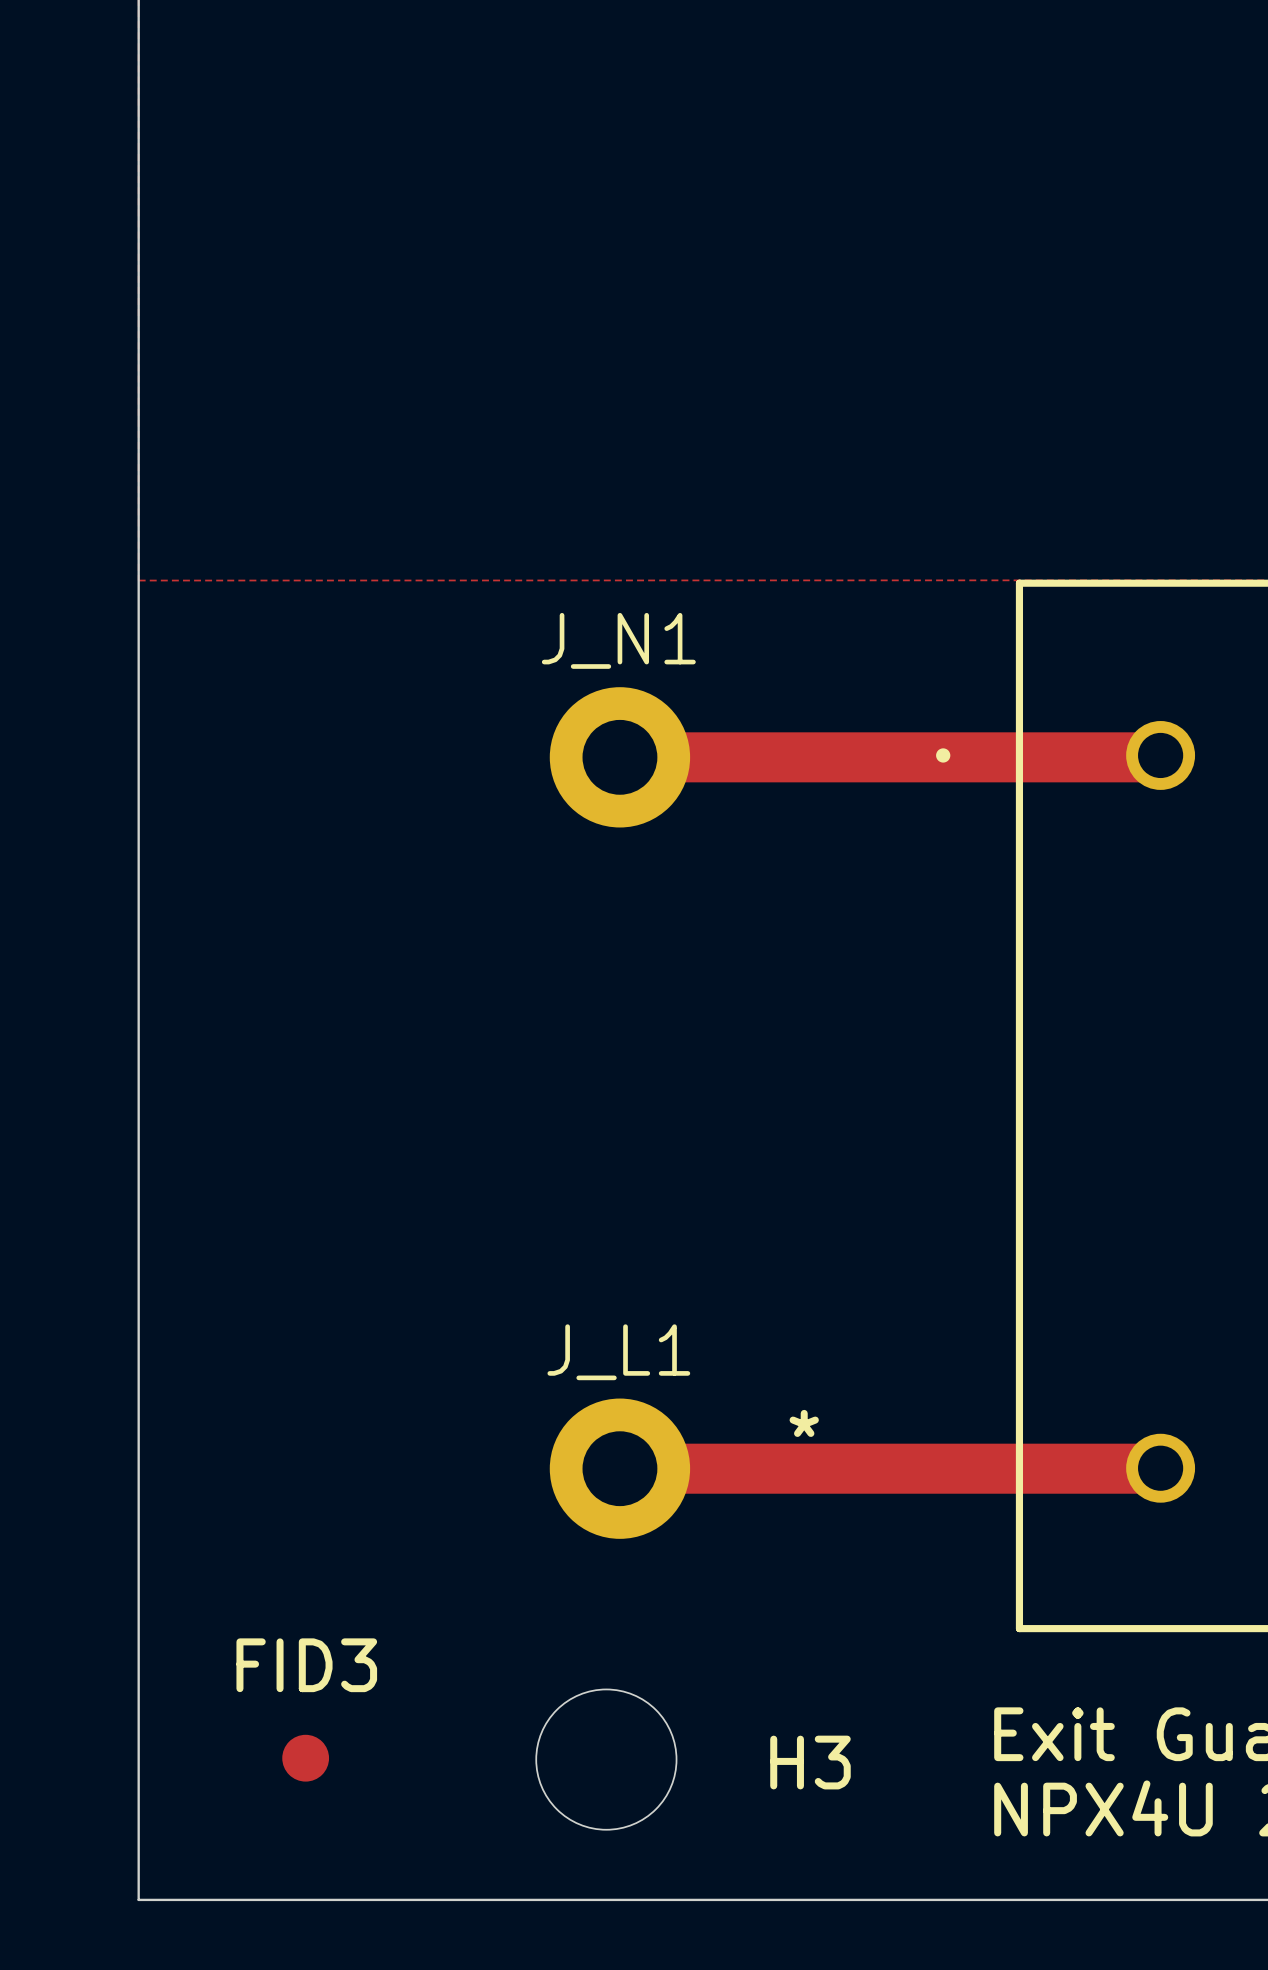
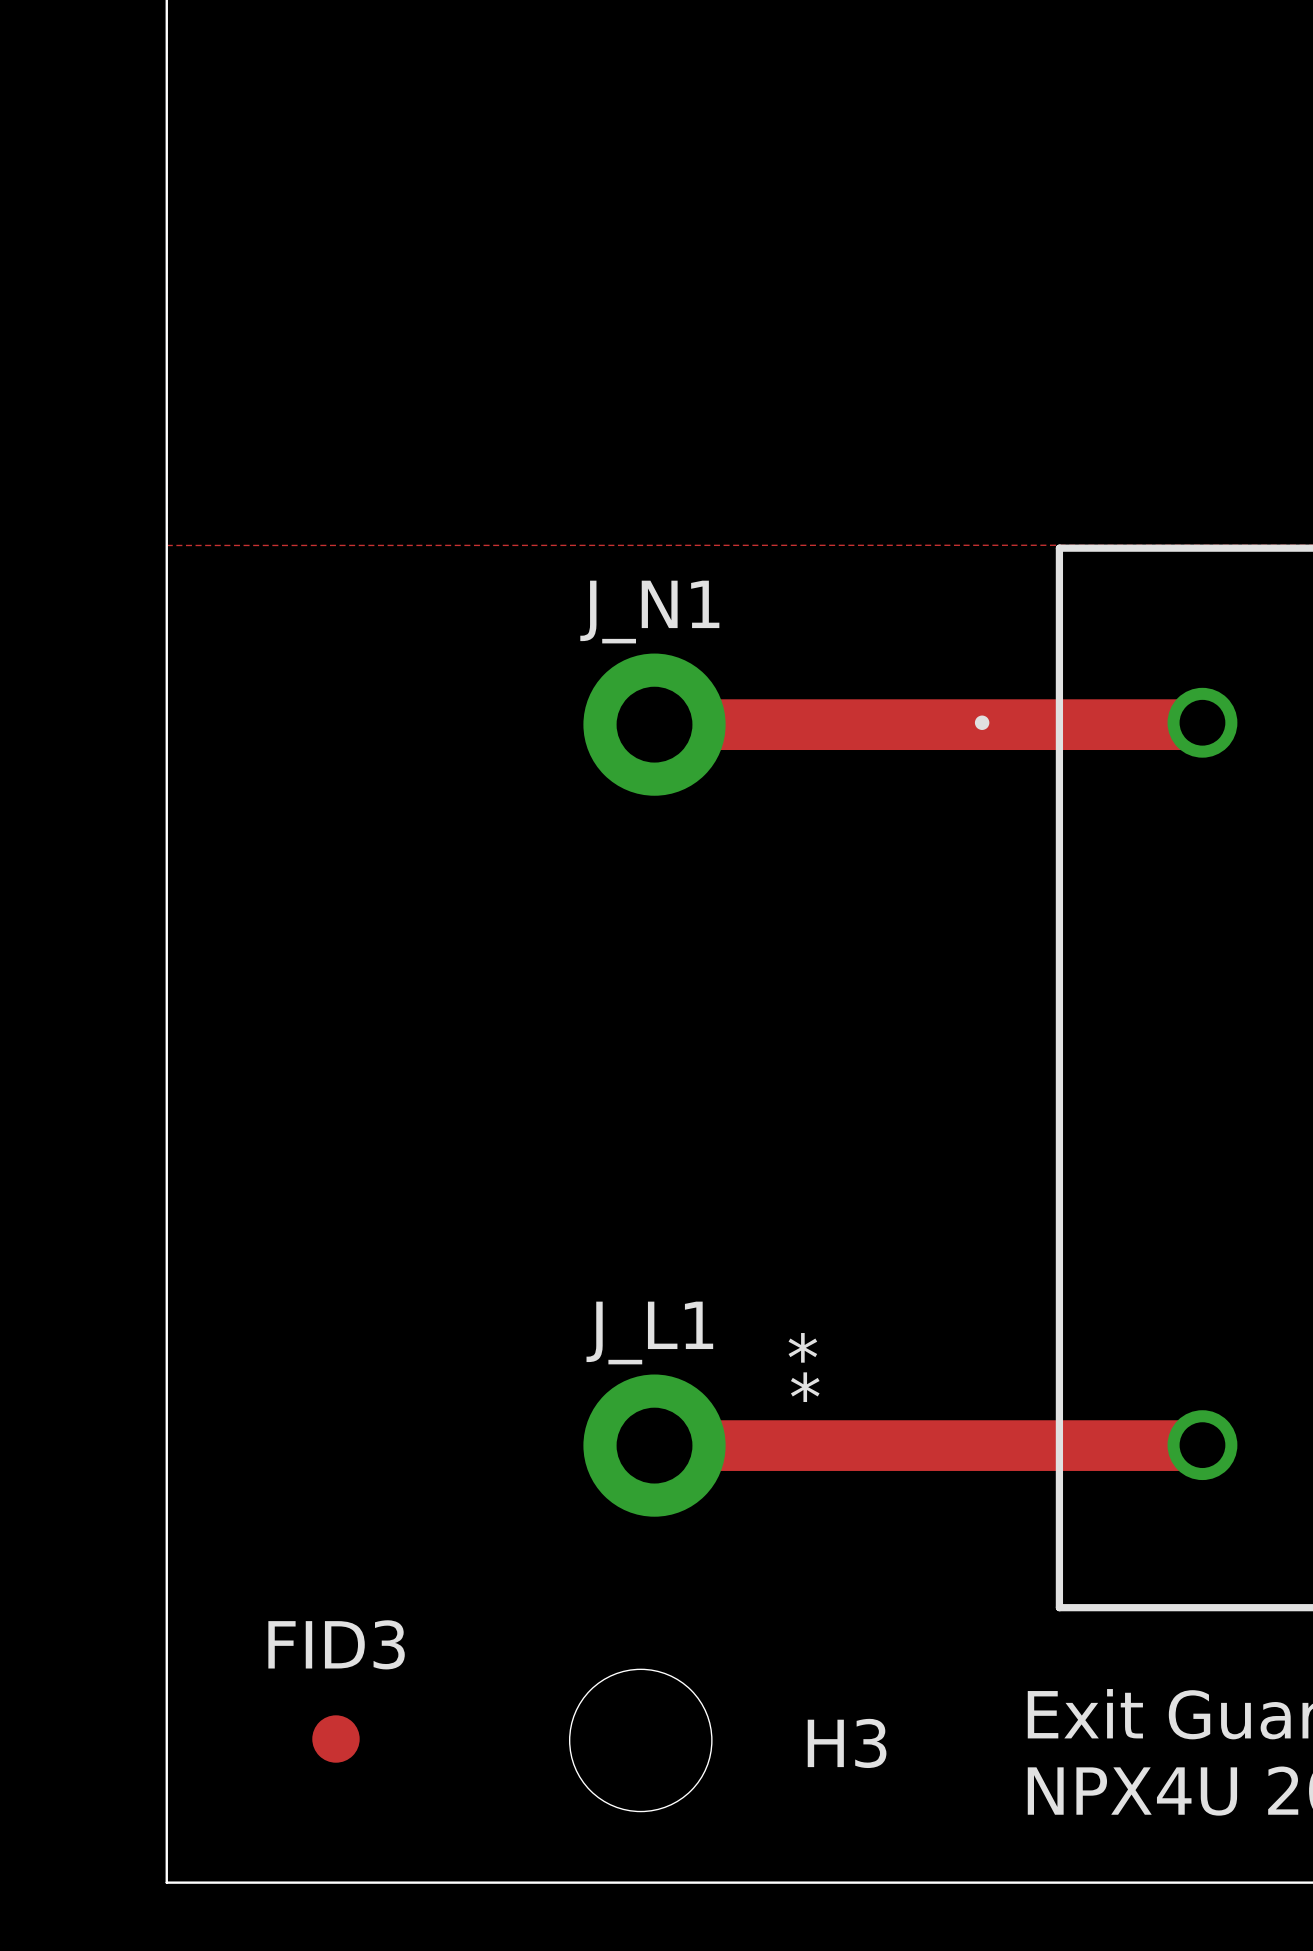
part text: none -> * (805, 1387)
part text position: * (804, 1423) -> * (802, 1347)

